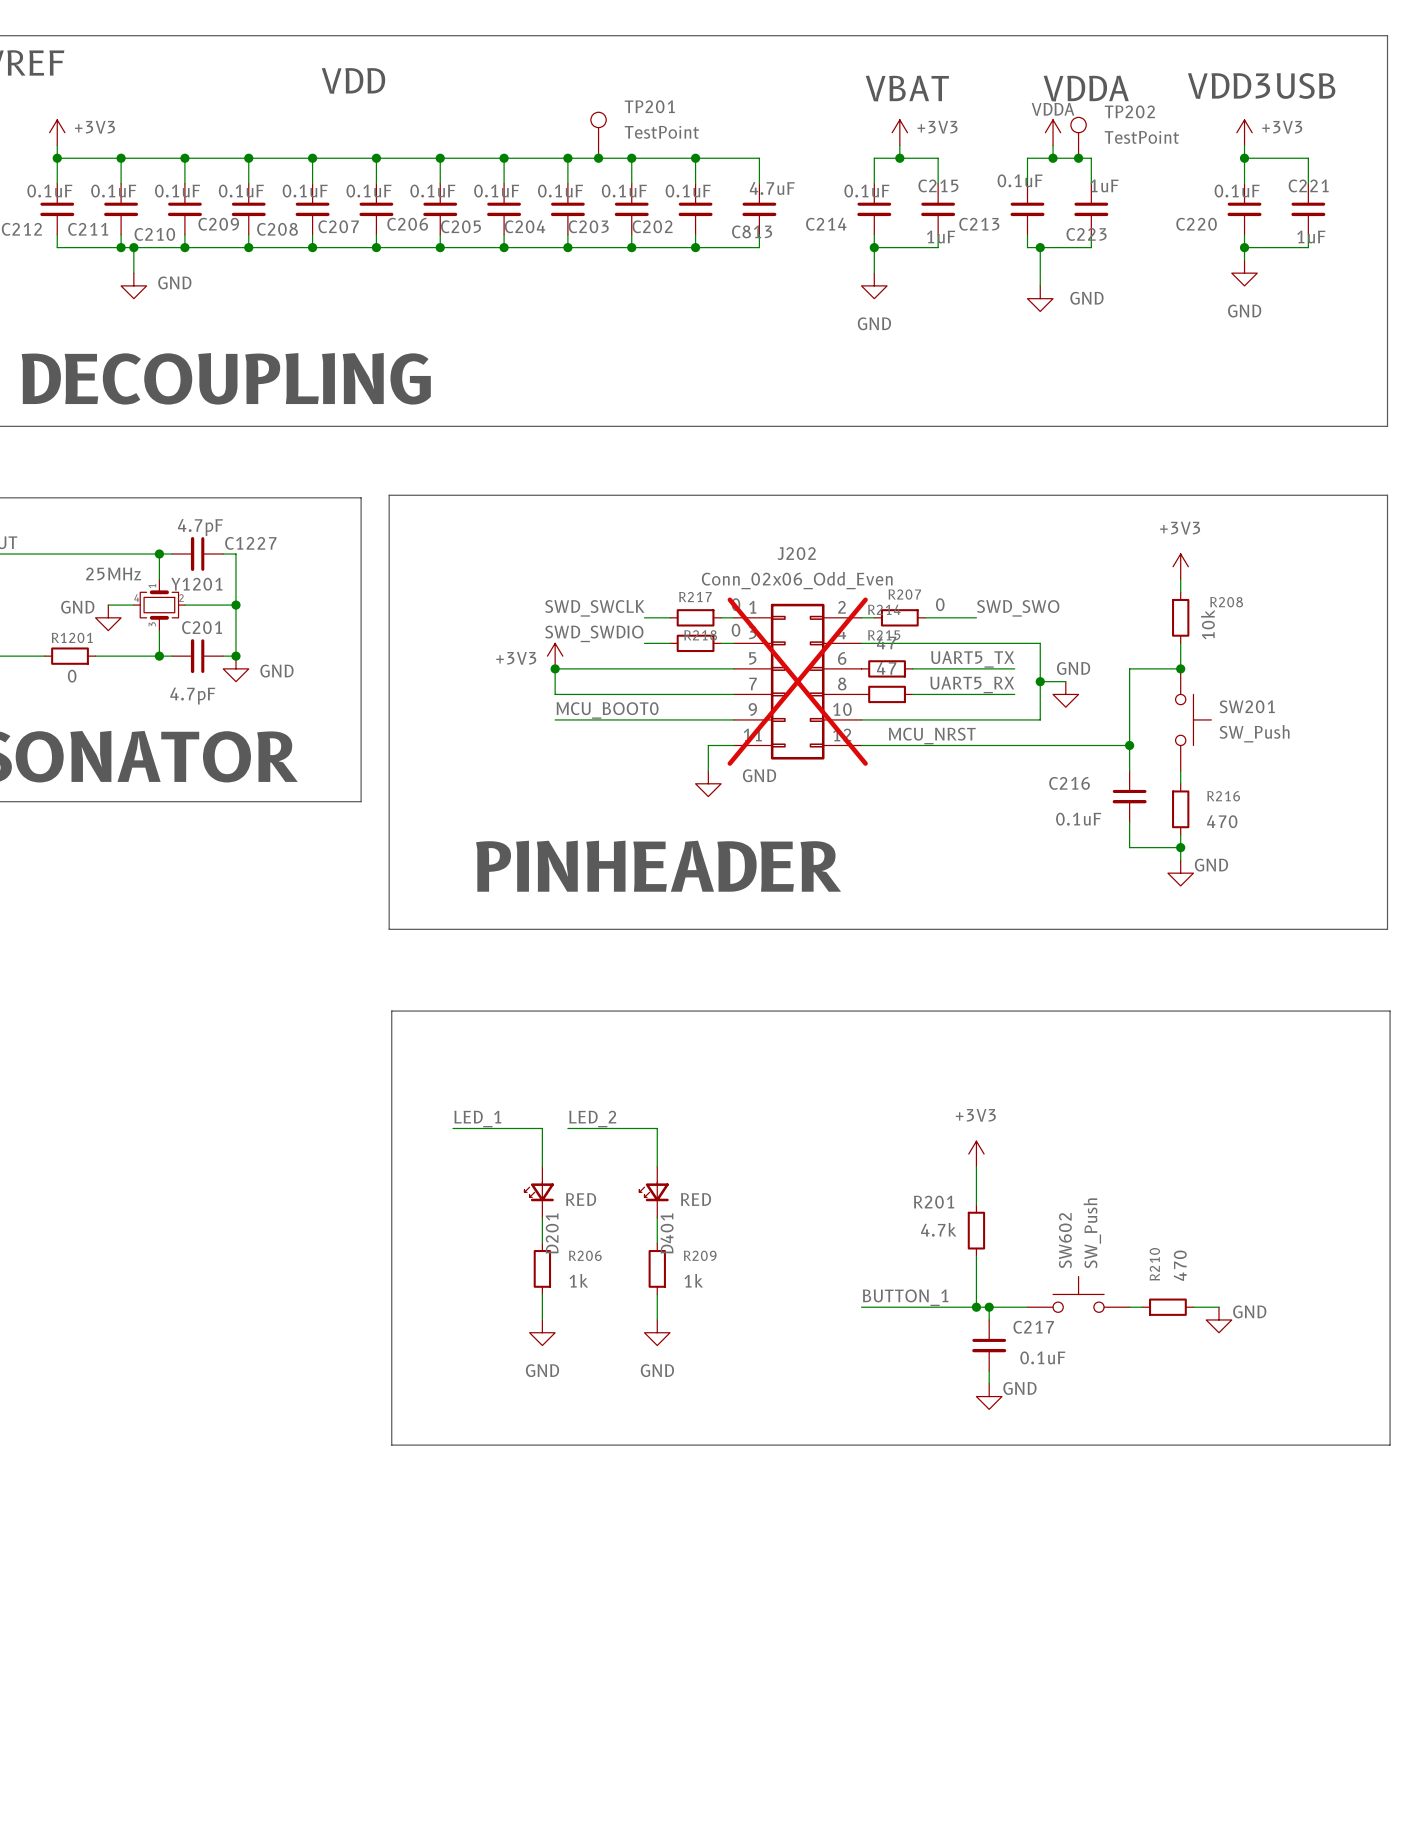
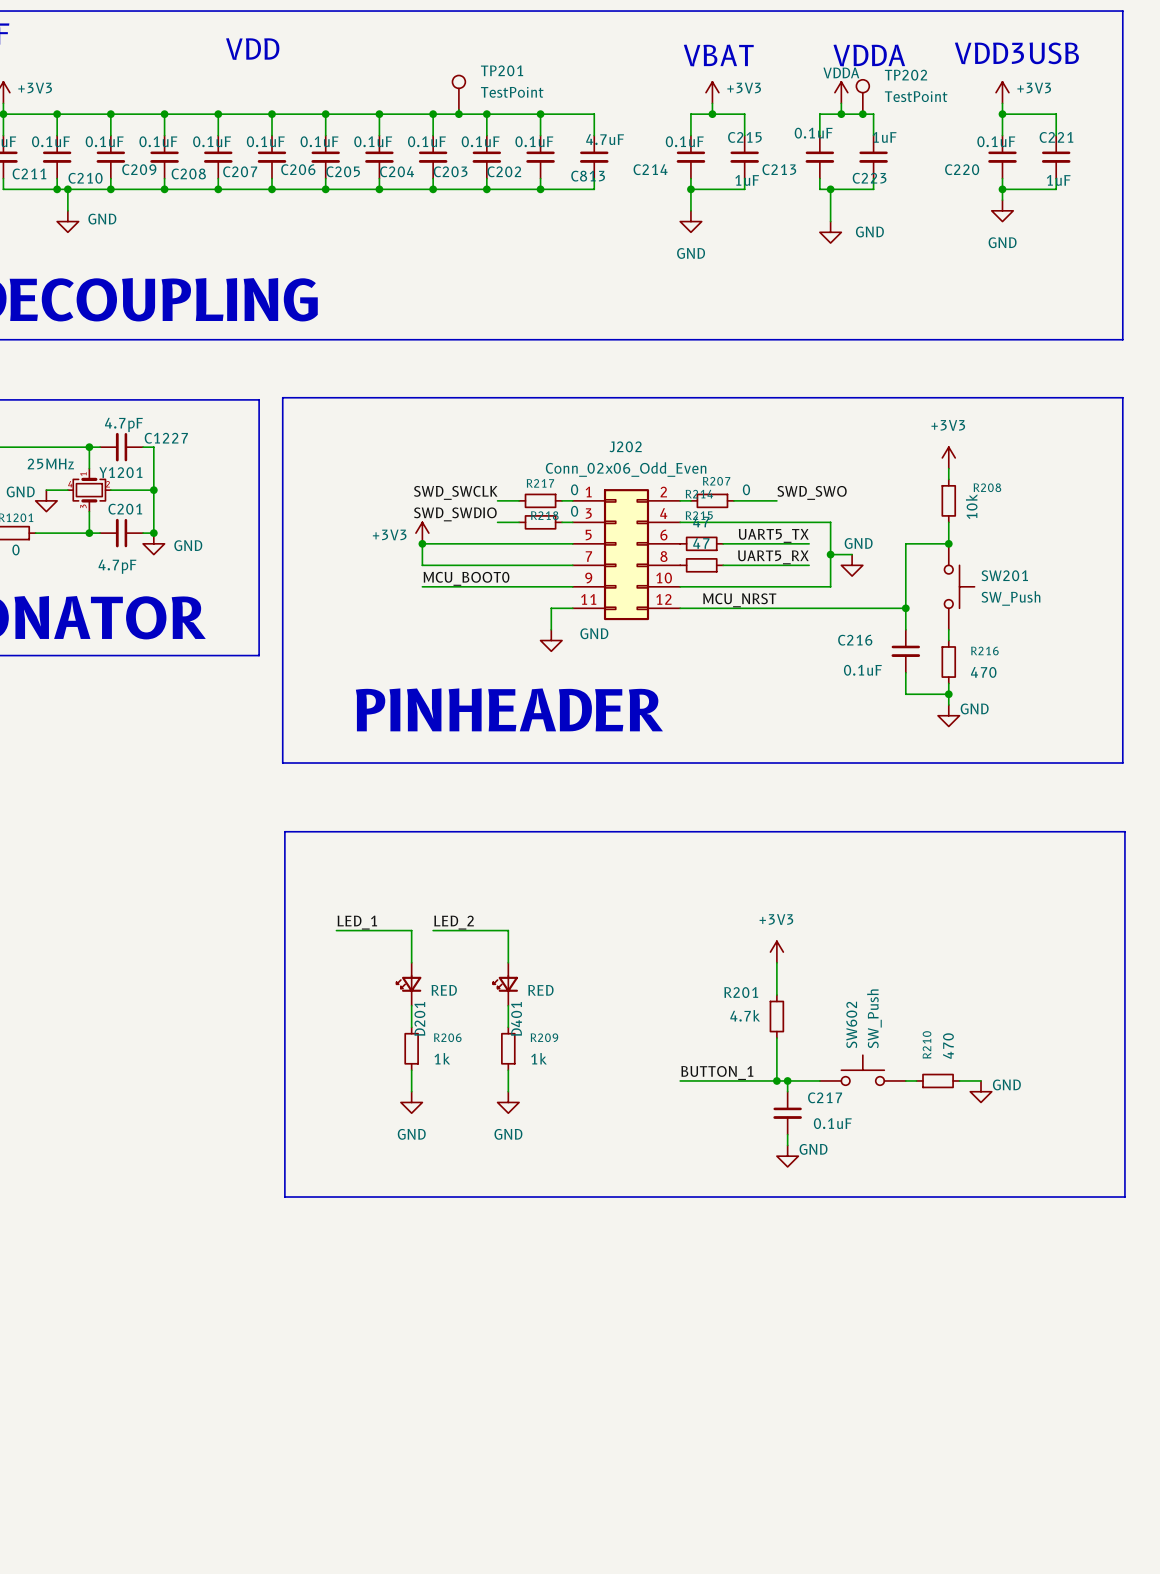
J202 do-not-place cross: (797, 681) -> none

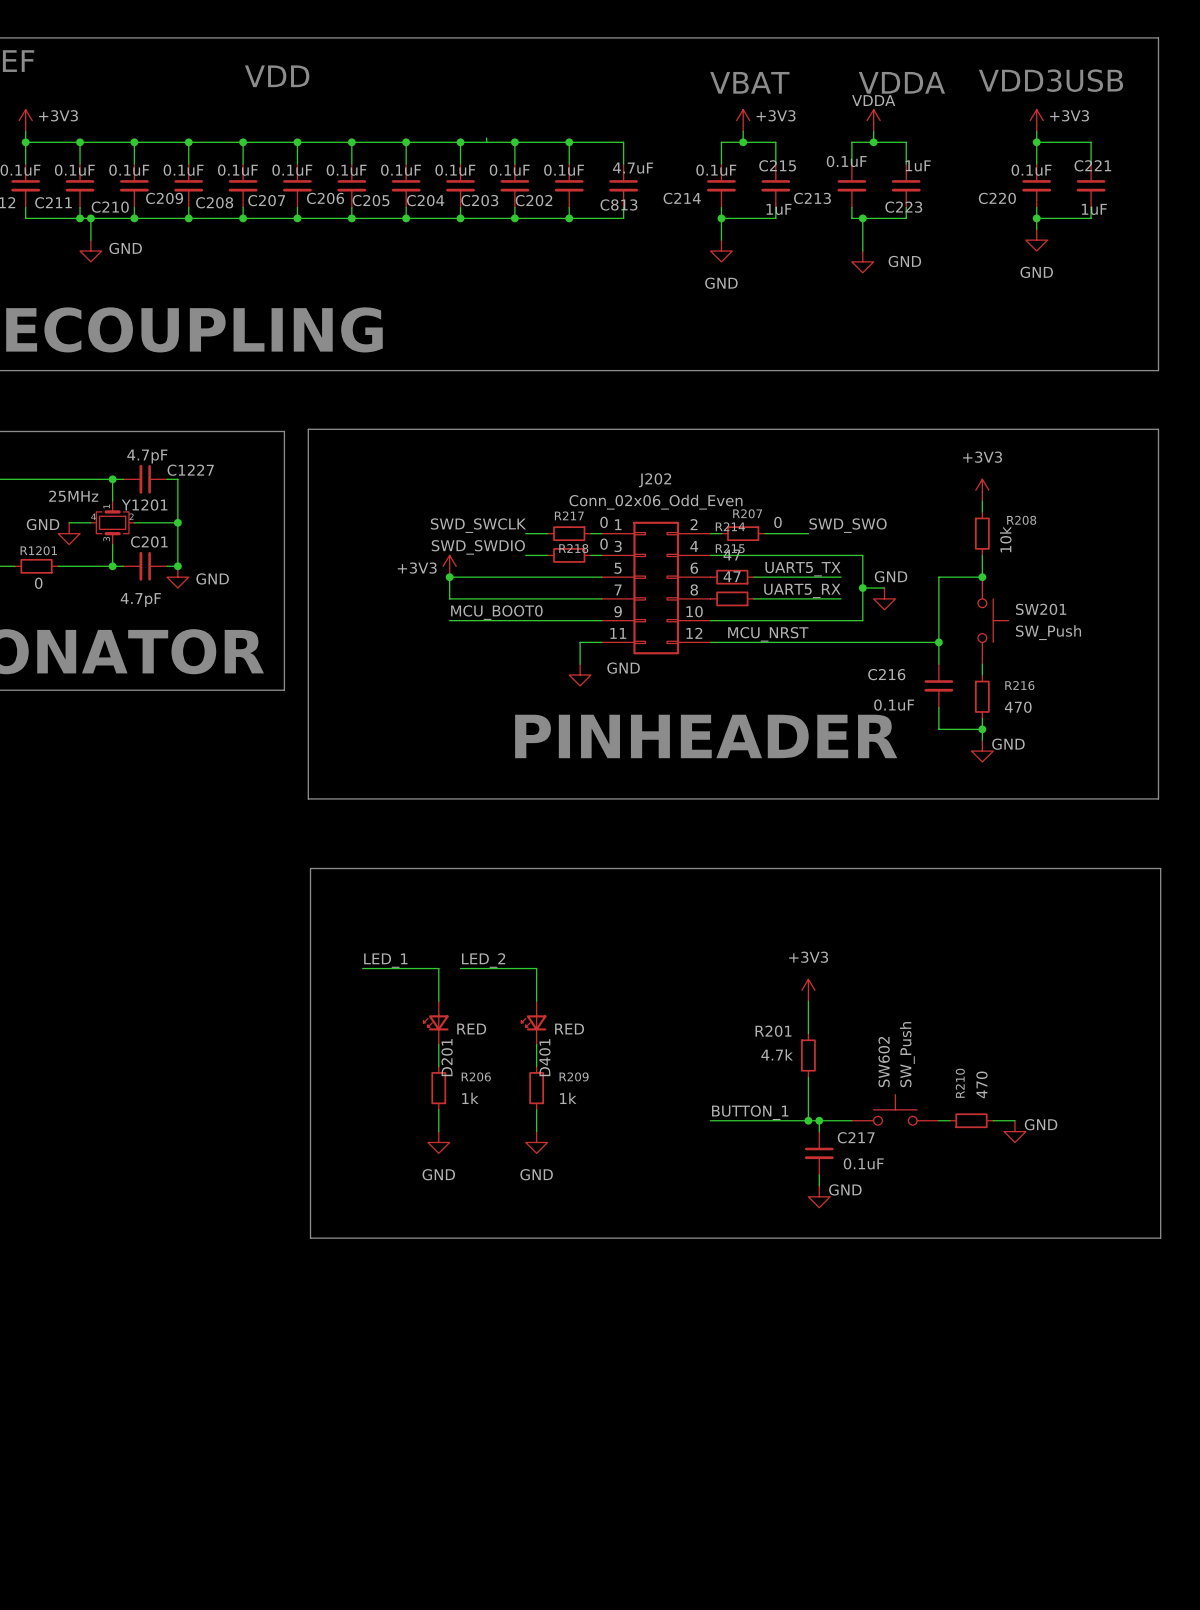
TP201: TestPoint (458, 92) -> none
TP202: TestPoint (862, 96) -> none
junction: (458, 114) -> none
junction: (862, 114) -> none
text position: PINHEADER (509, 709) -> PINHEADER (706, 736)

